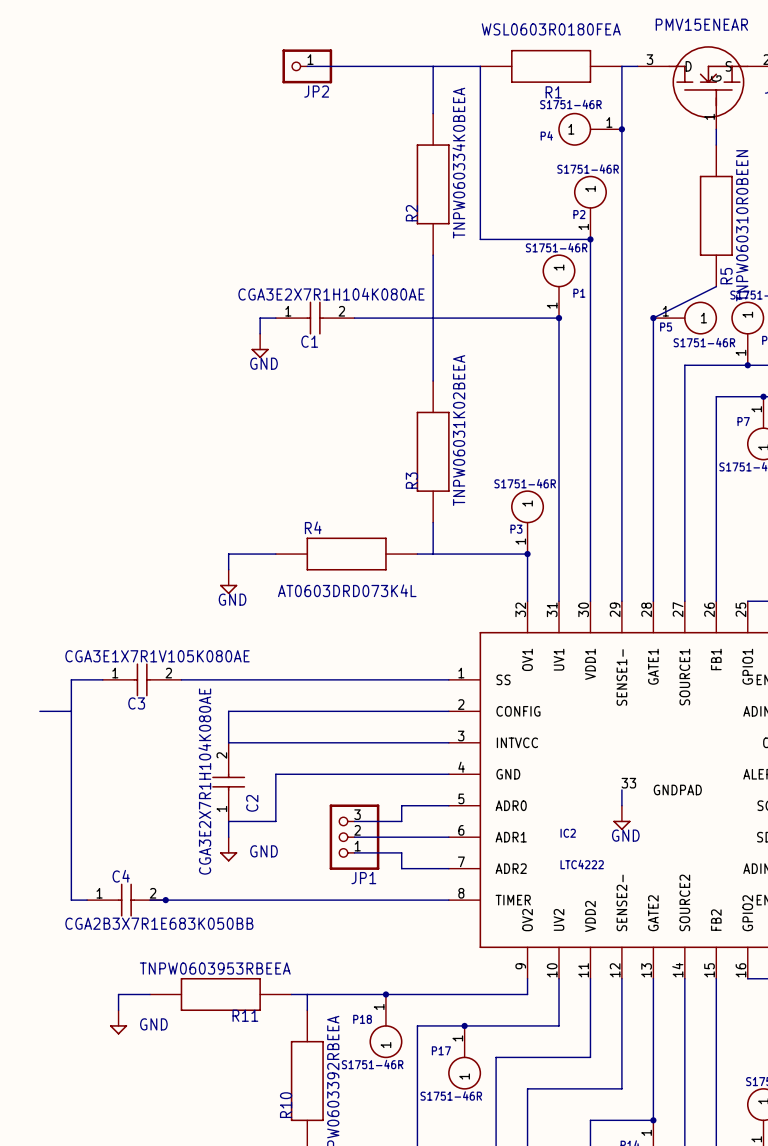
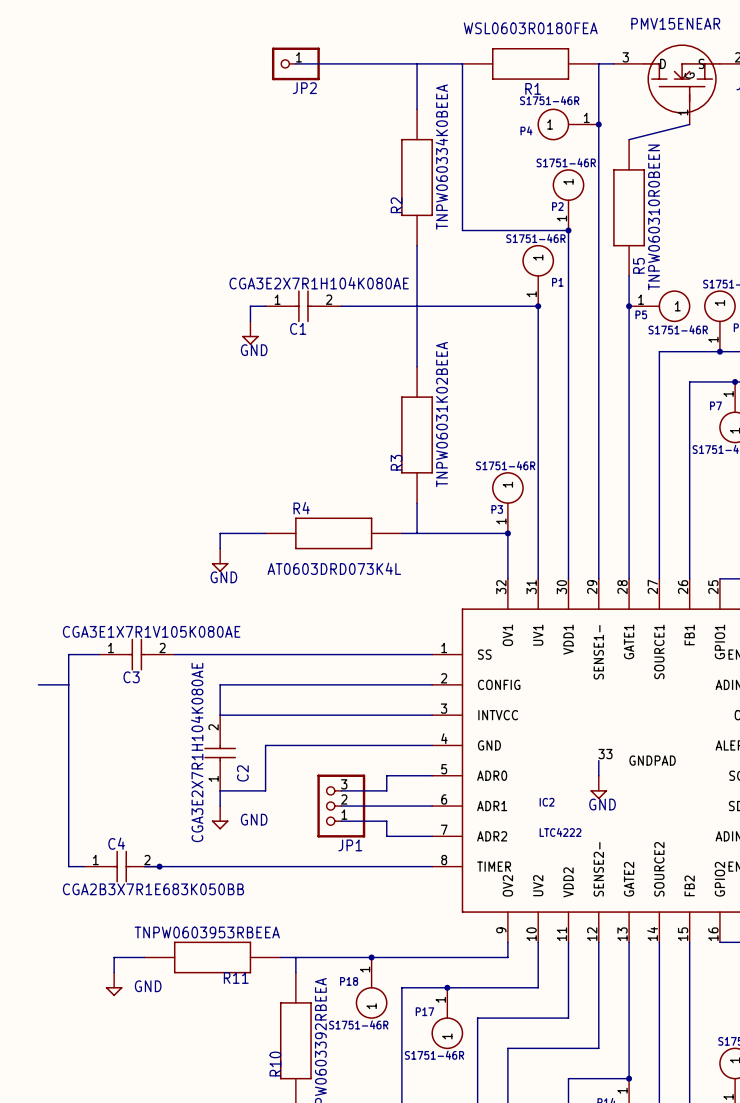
wire: (716, 129) (716, 145) -> (689, 124) (629, 139)
R5 position: (716, 215) -> (629, 207)
wire: (716, 286) (653, 318) -> (629, 275) (629, 306)

